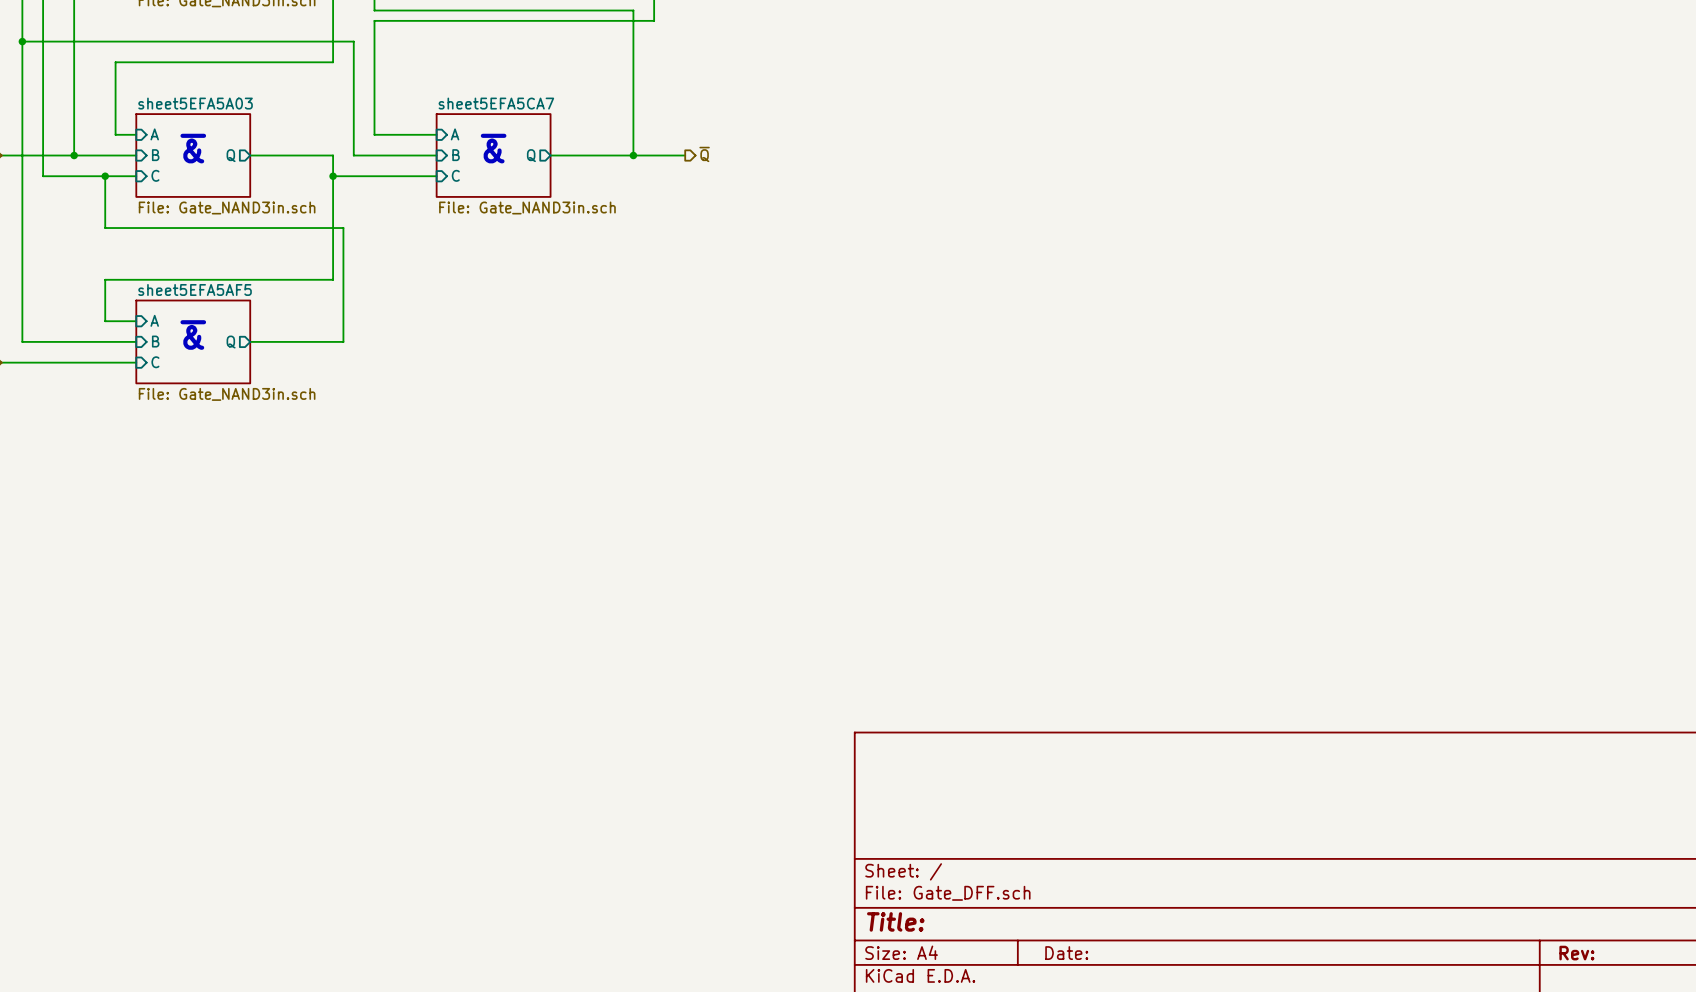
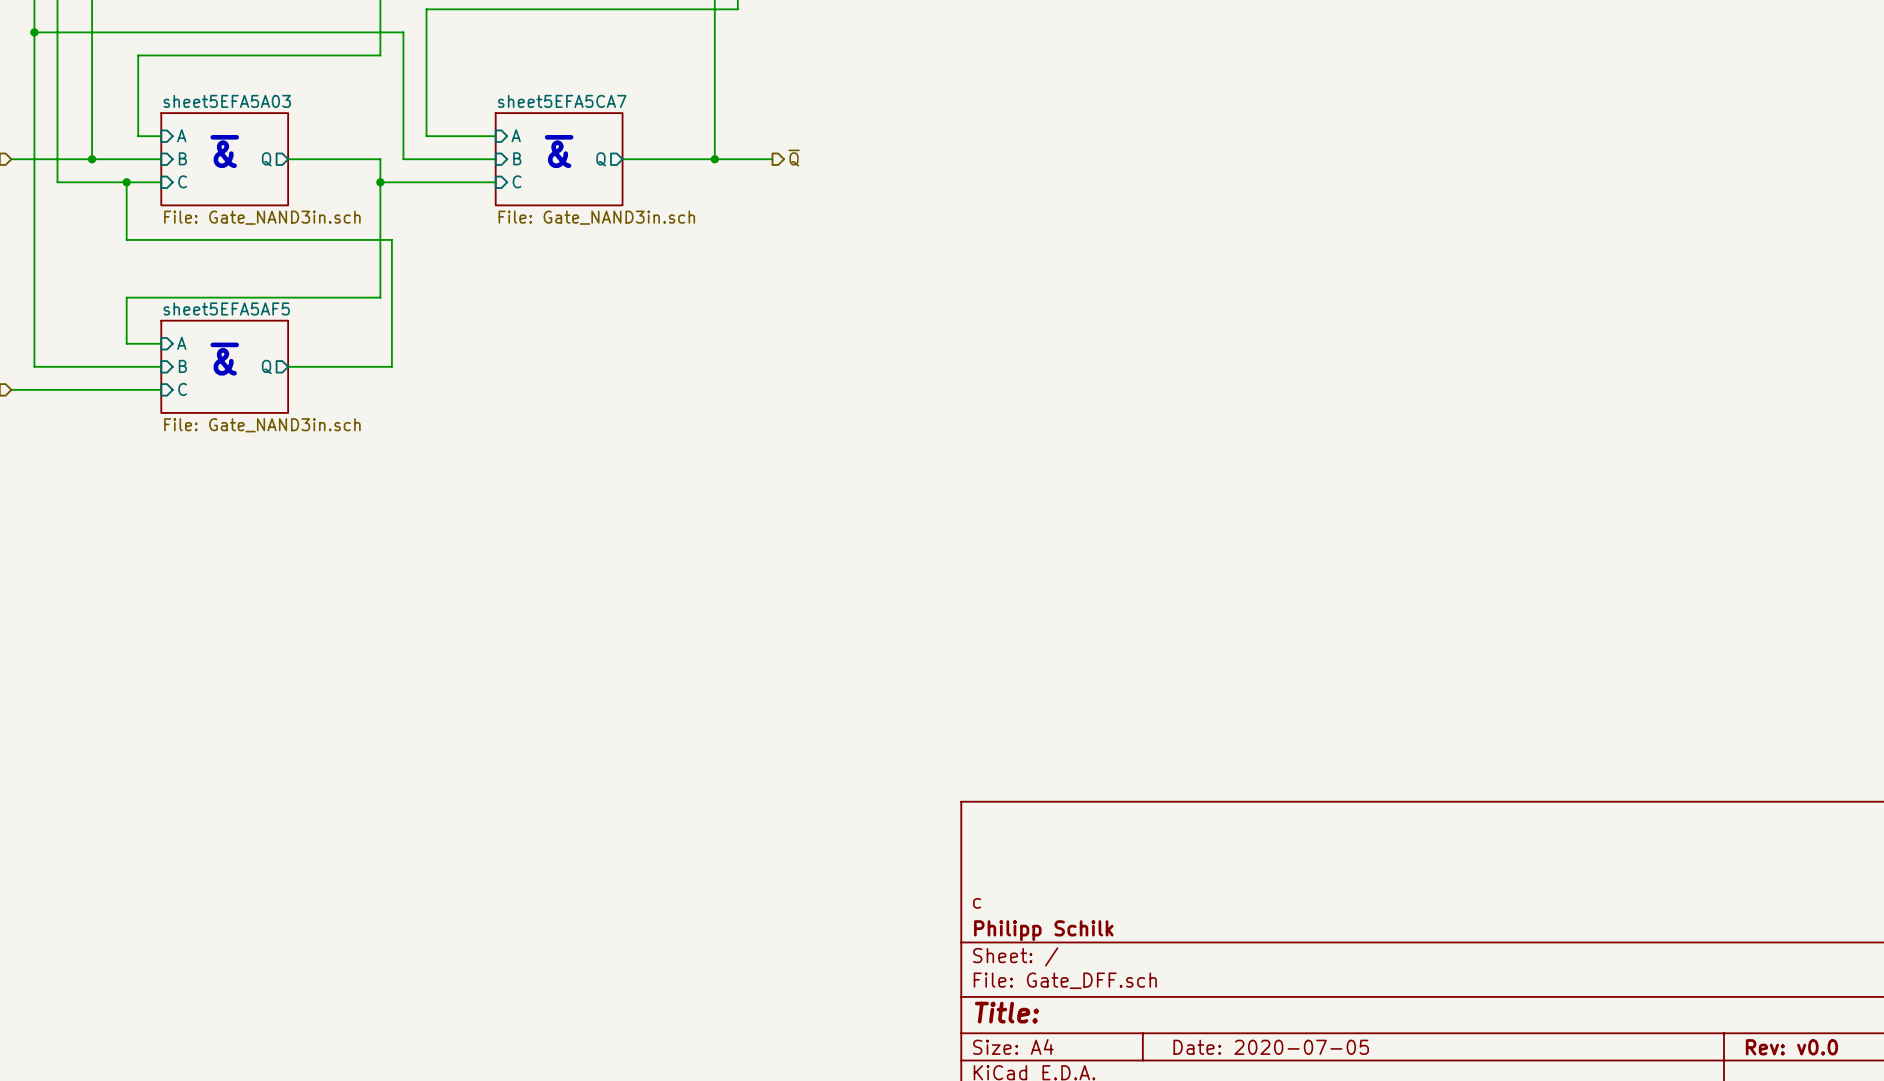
title block: none -> c (977, 903)
title block: none -> Philipp Schilk (1043, 930)
title block: Date: (1066, 953) -> Date: 2020-07-05 (1271, 1047)
title block: Rev: (1576, 953) -> Rev: v0.0 (1791, 1047)

